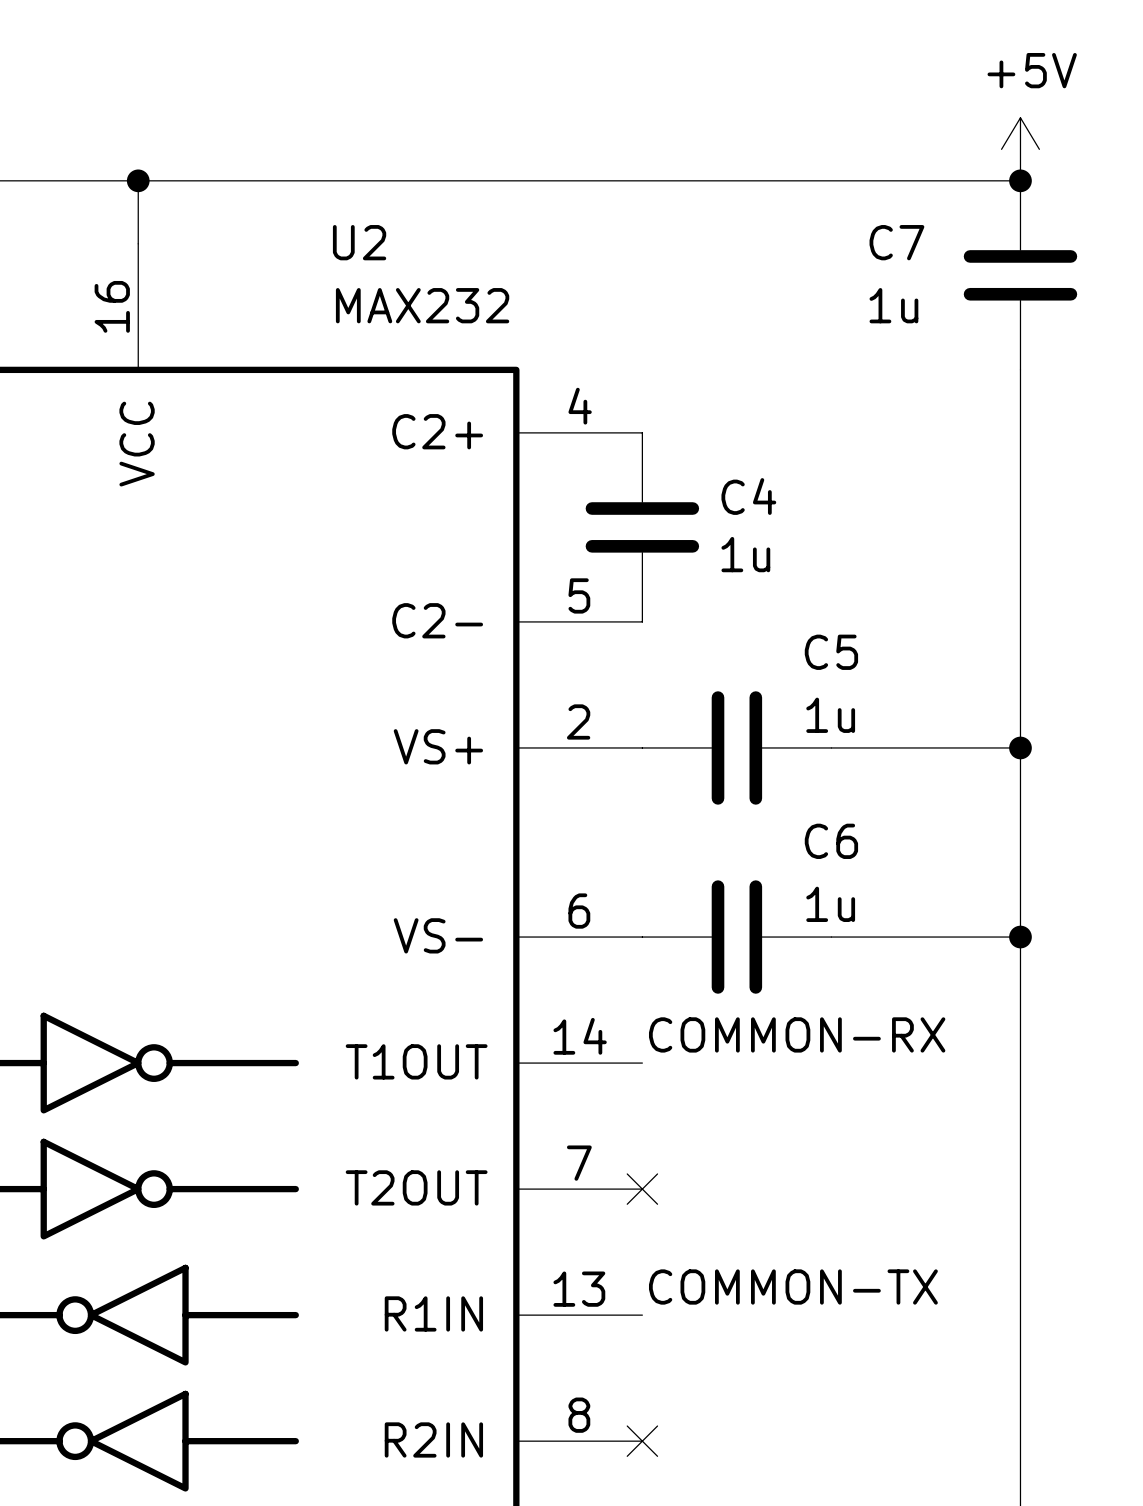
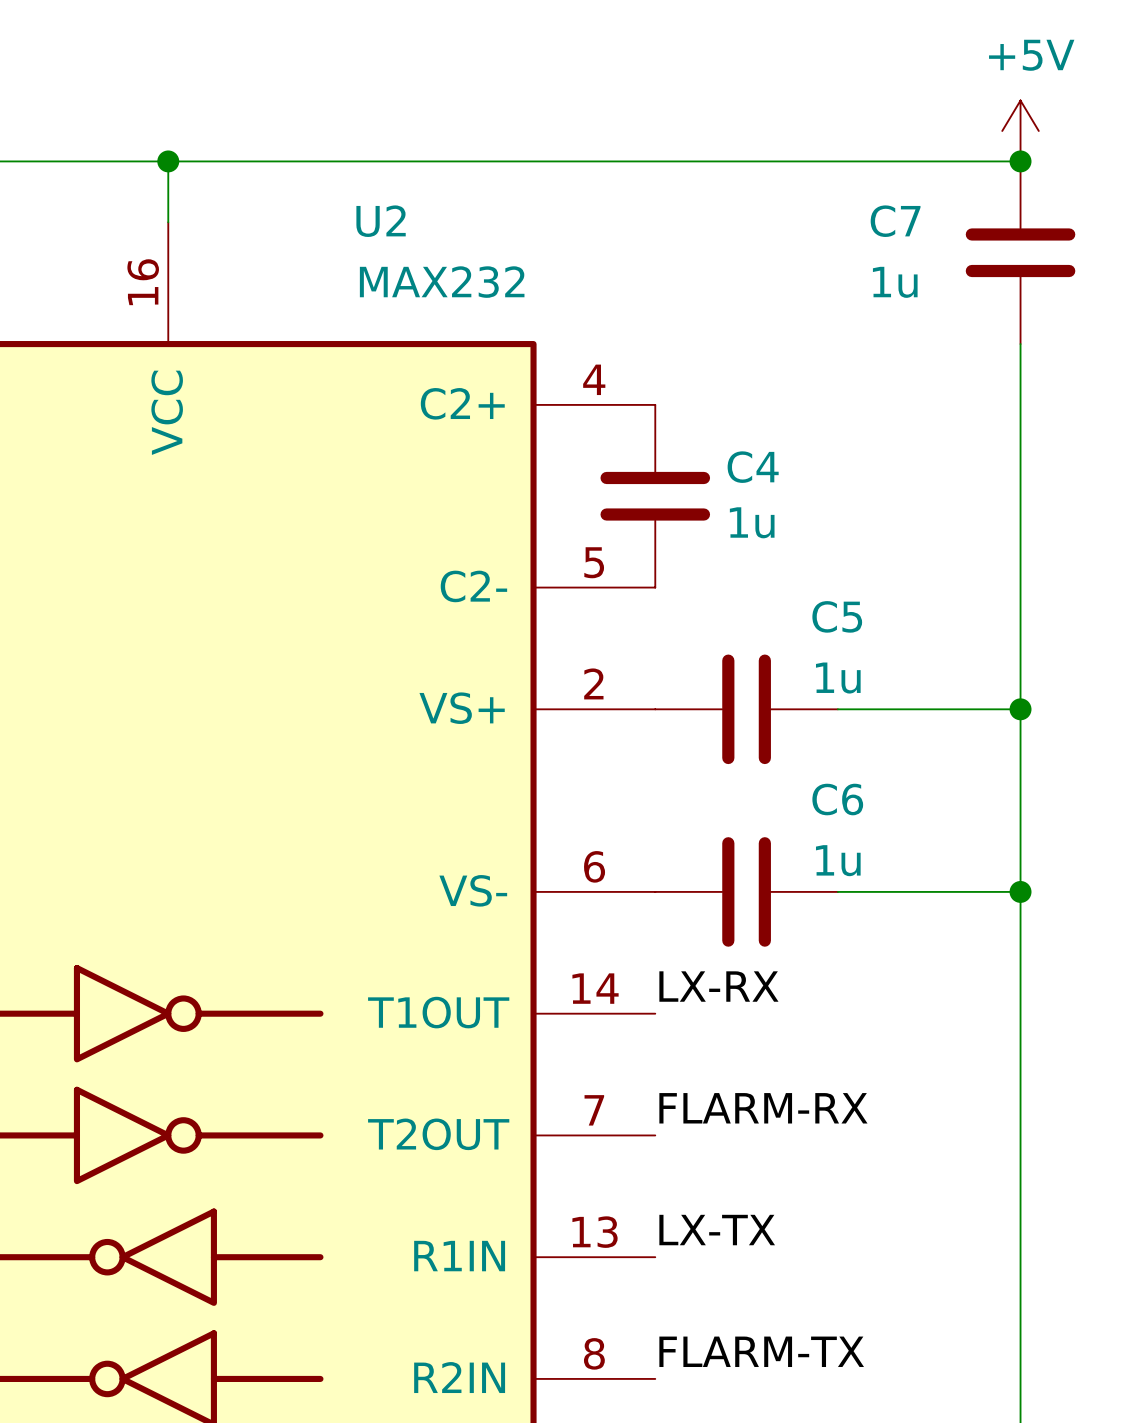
label: COMMON-RX (797, 1034) -> LX-RX (718, 986)
label: none -> FLARM-RX (763, 1108)
no-connect mark: (642, 1189) -> none
label: COMMON-TX (793, 1287) -> LX-TX (717, 1230)
label: none -> FLARM-TX (761, 1351)
no-connect mark: (642, 1441) -> none

